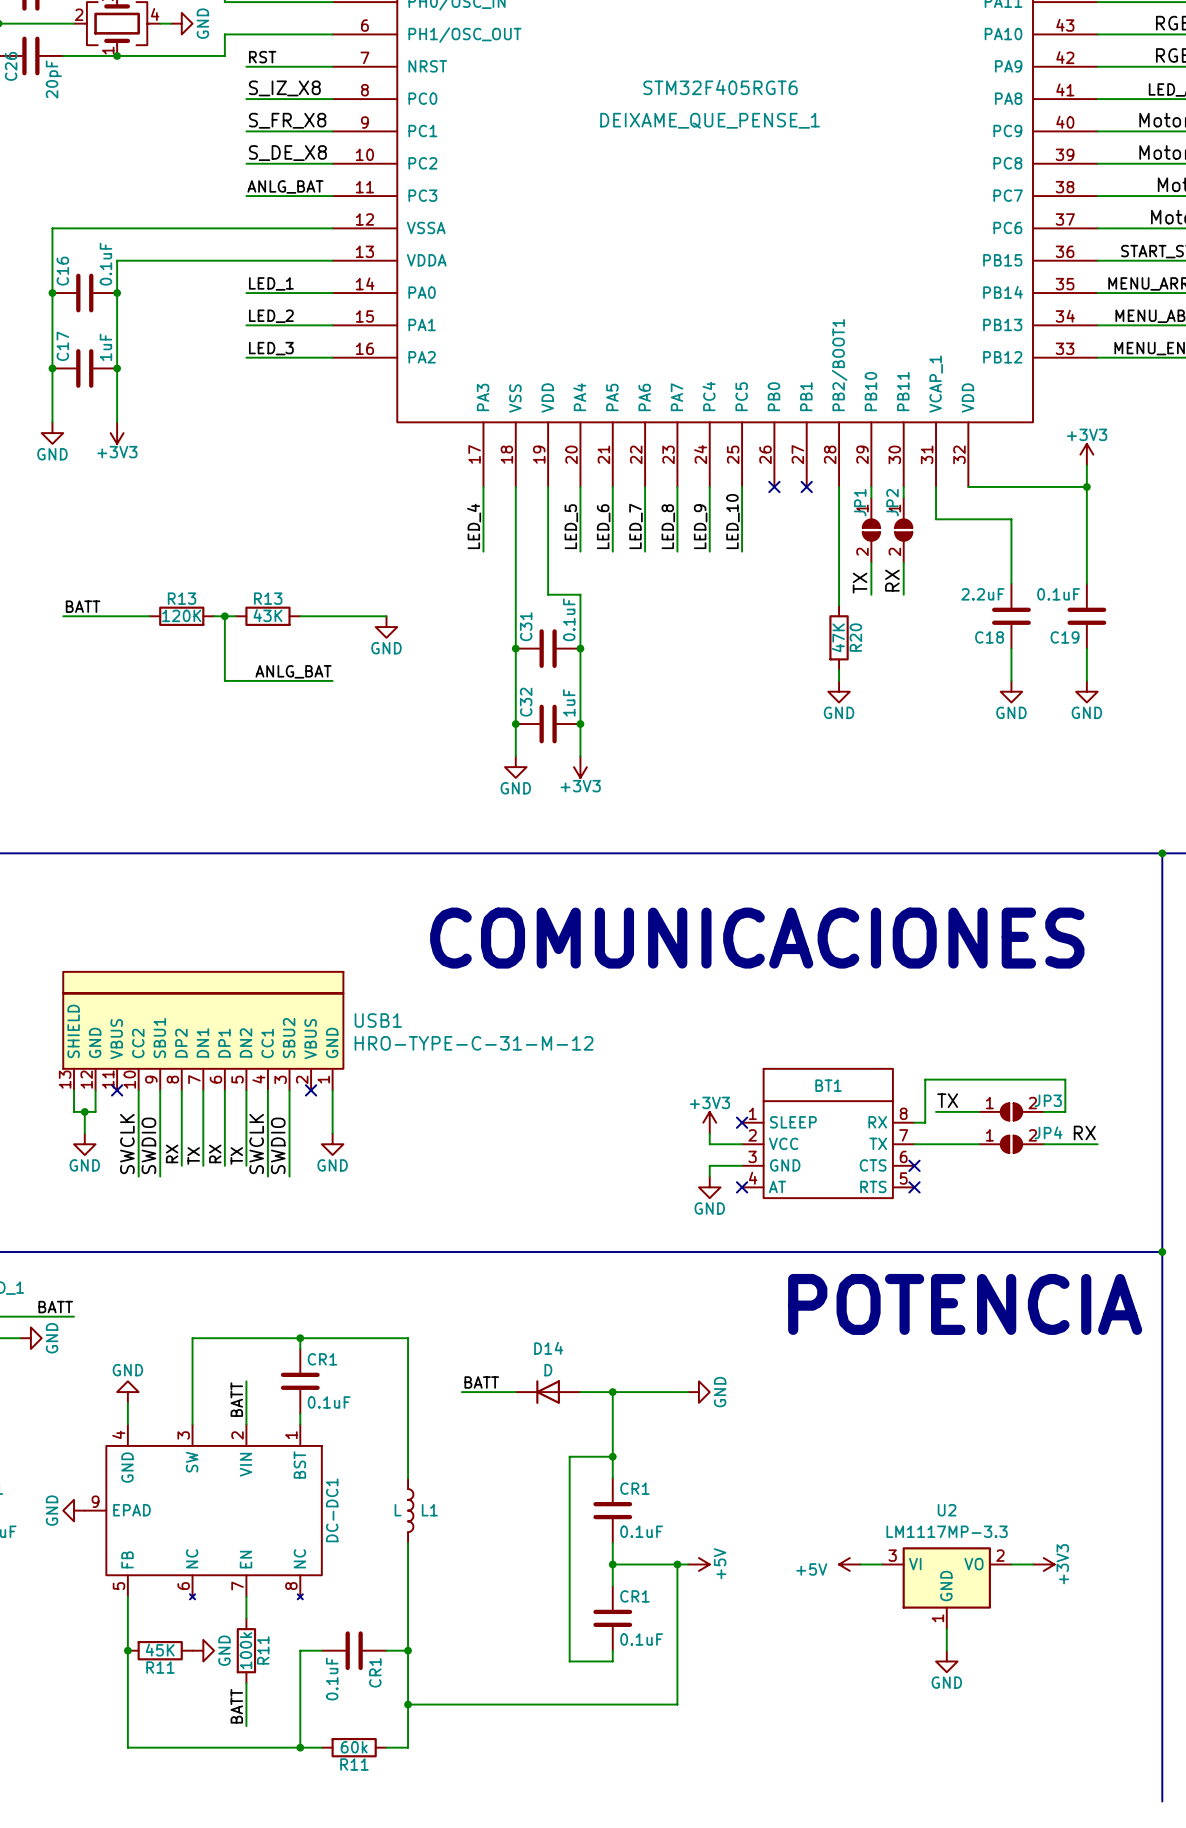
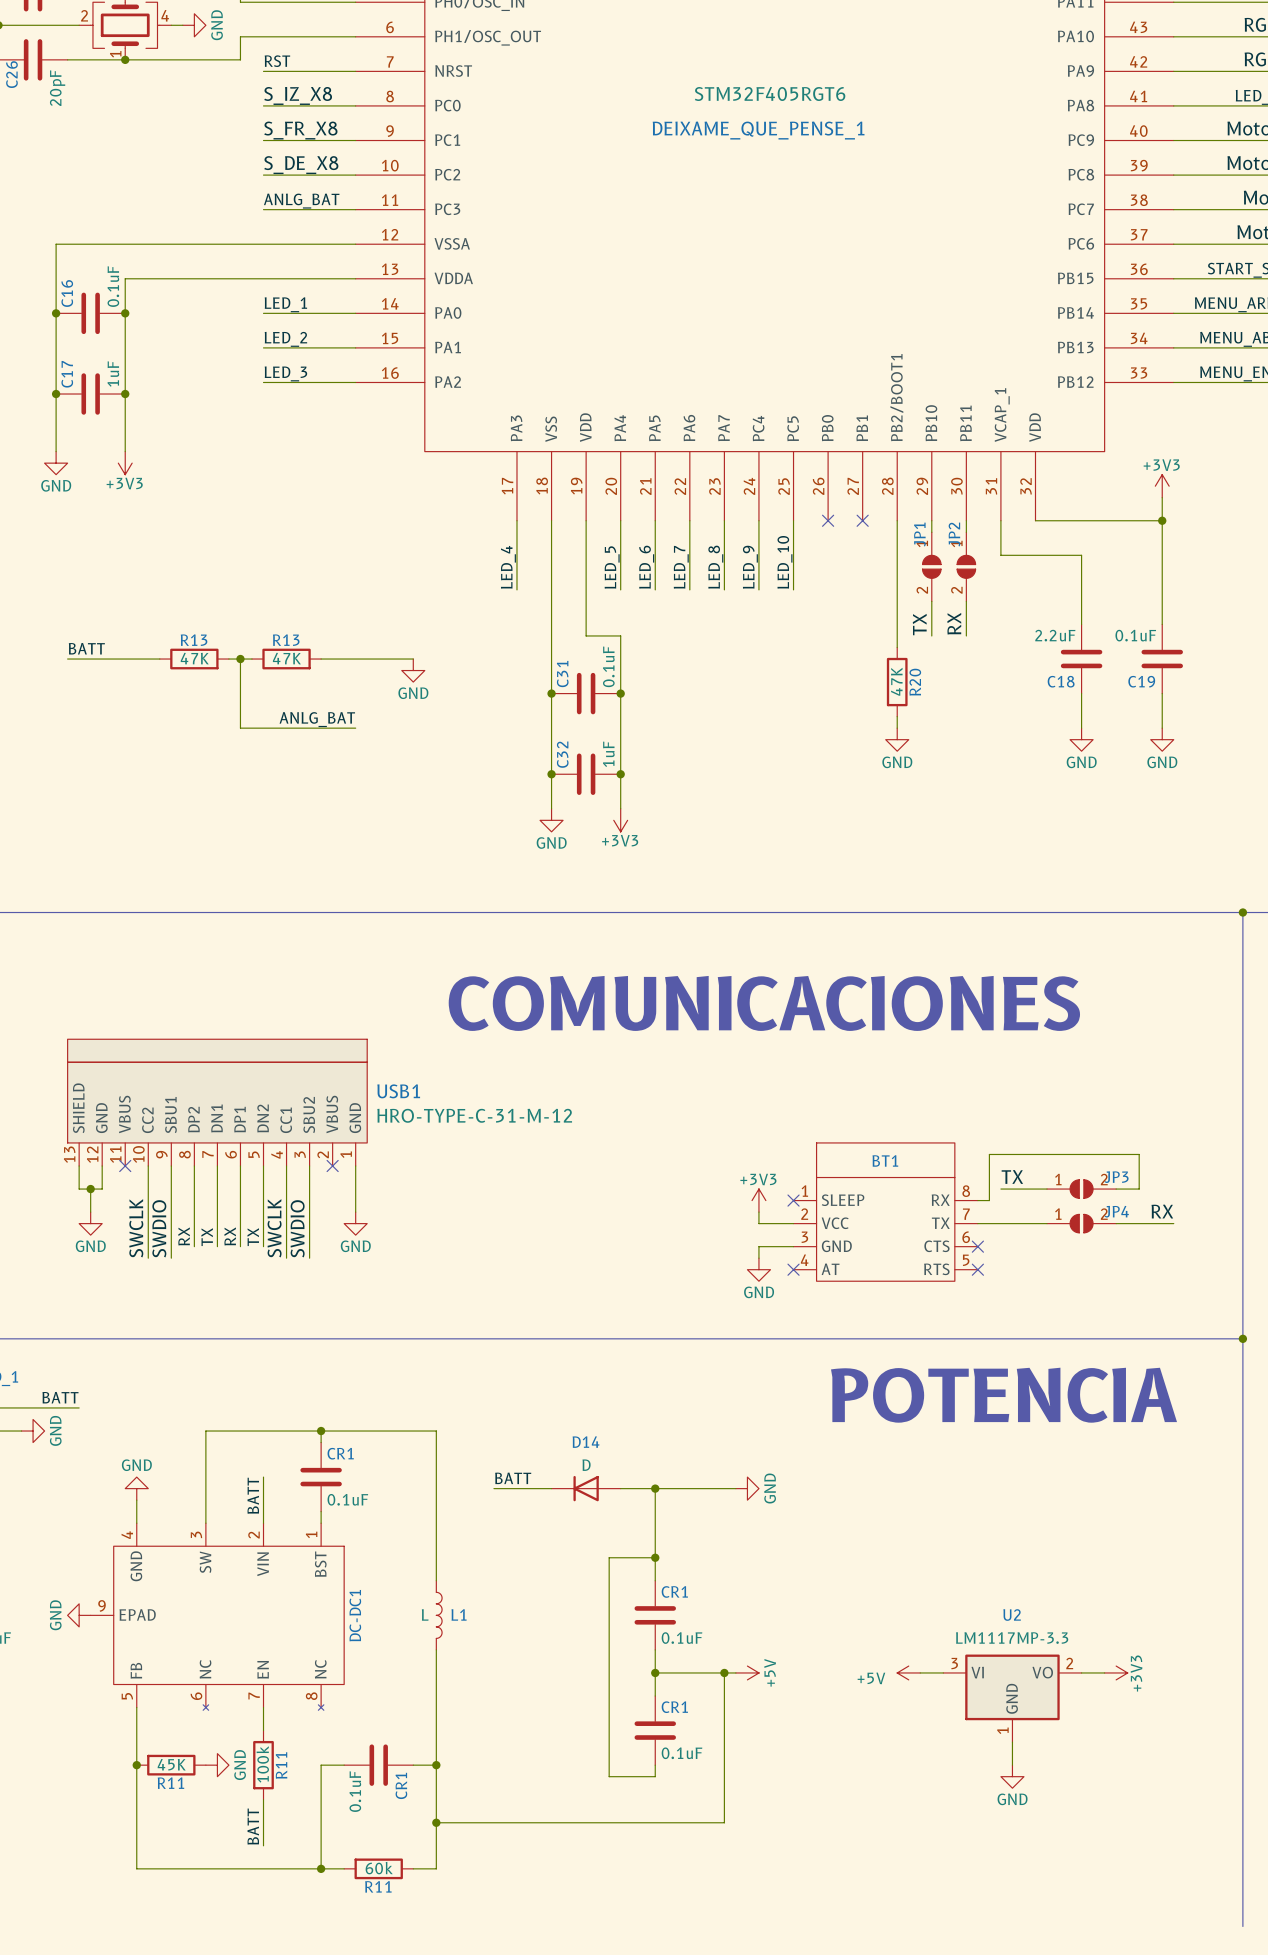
R13 value: 120K (181, 615) -> 47K (194, 658)
R13 value: 43K (267, 615) -> 47K (286, 658)

